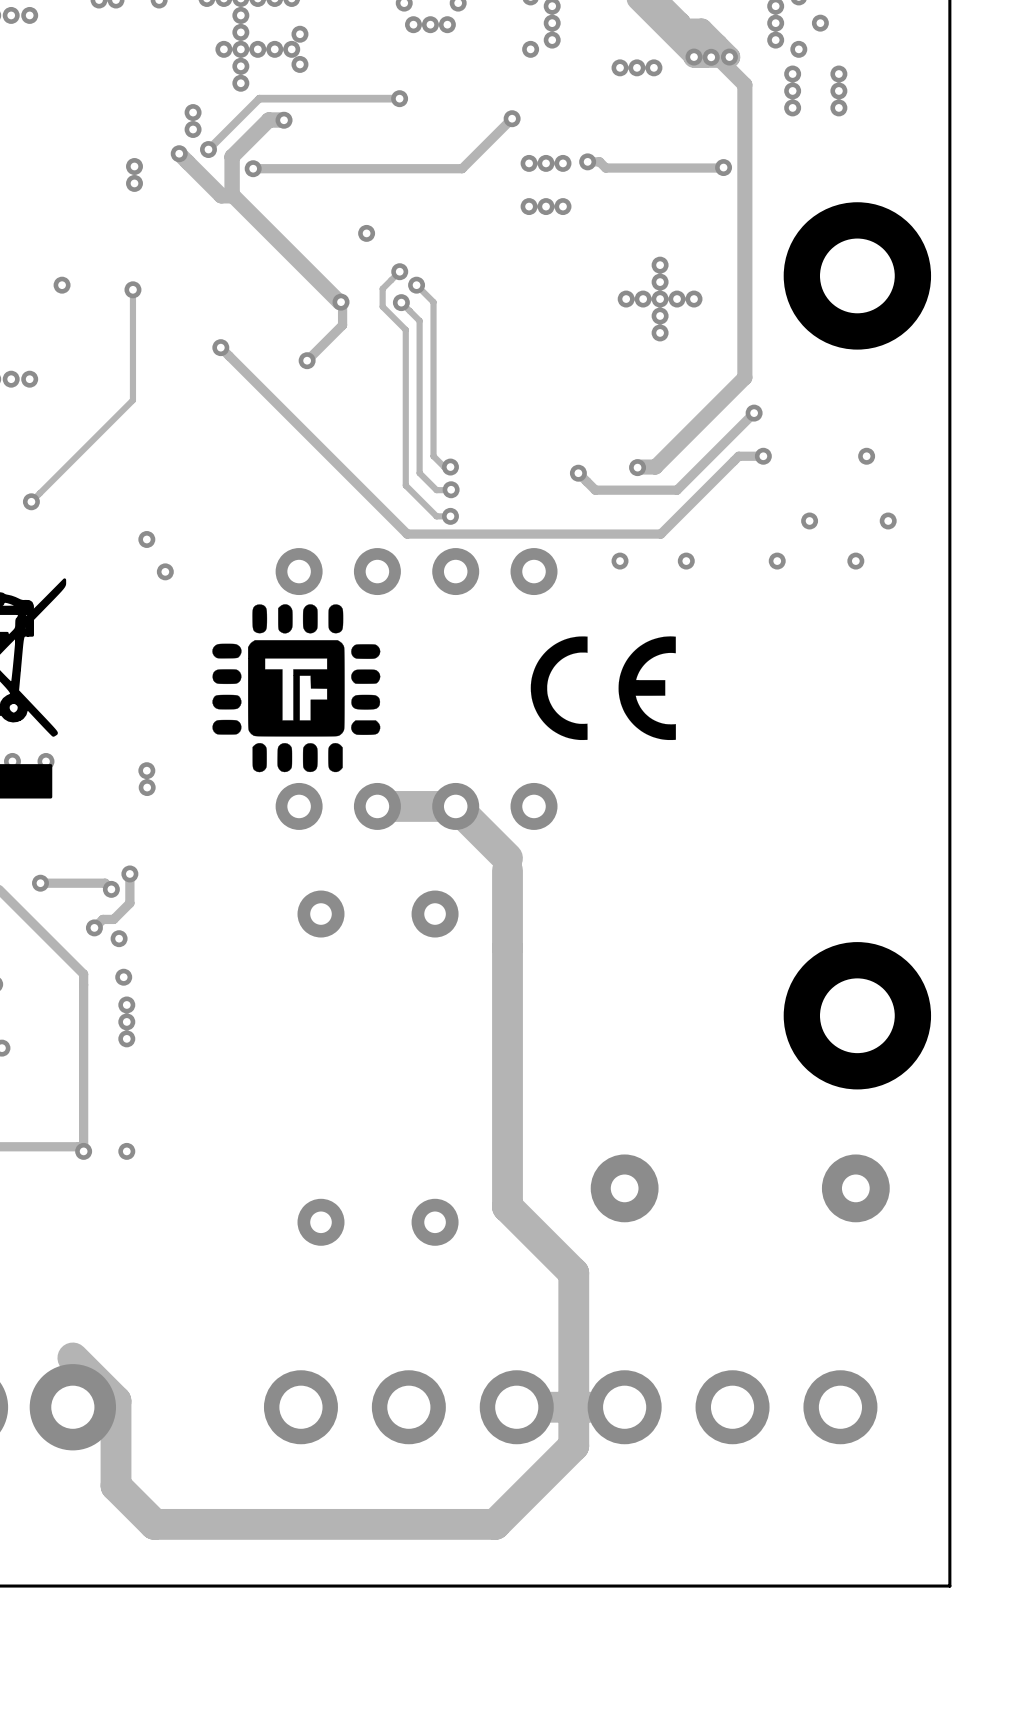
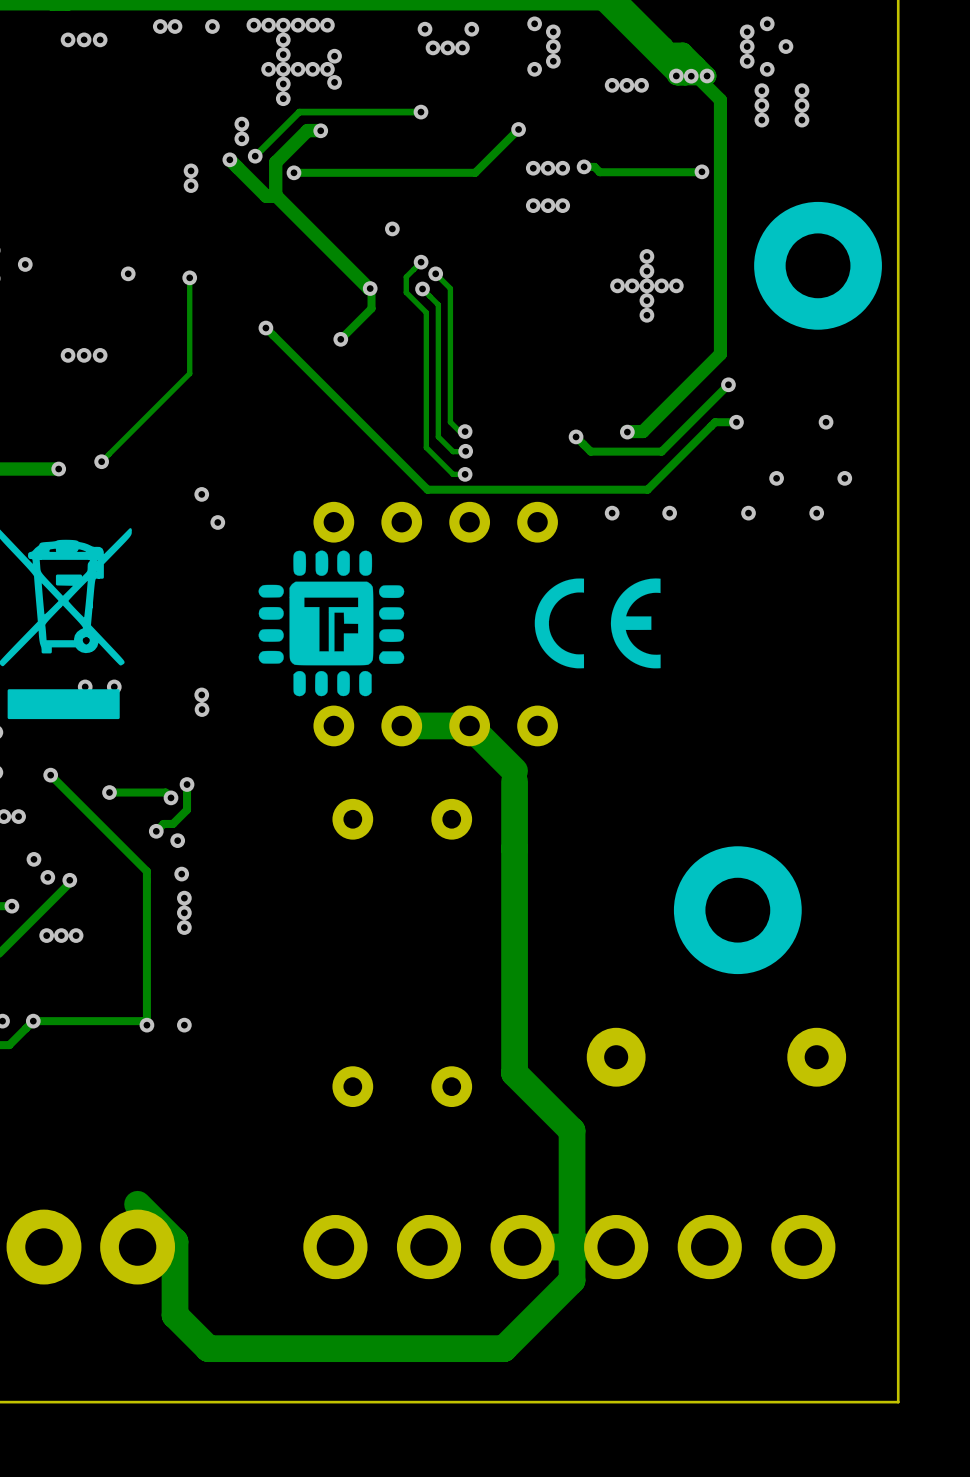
part position: (857, 1015) -> (737, 910)

